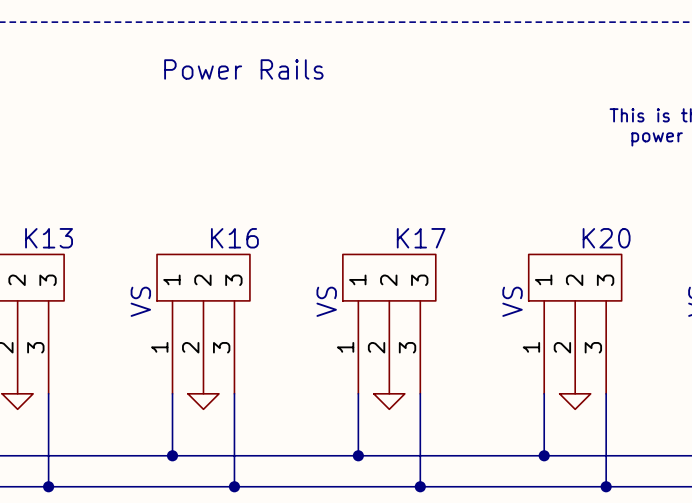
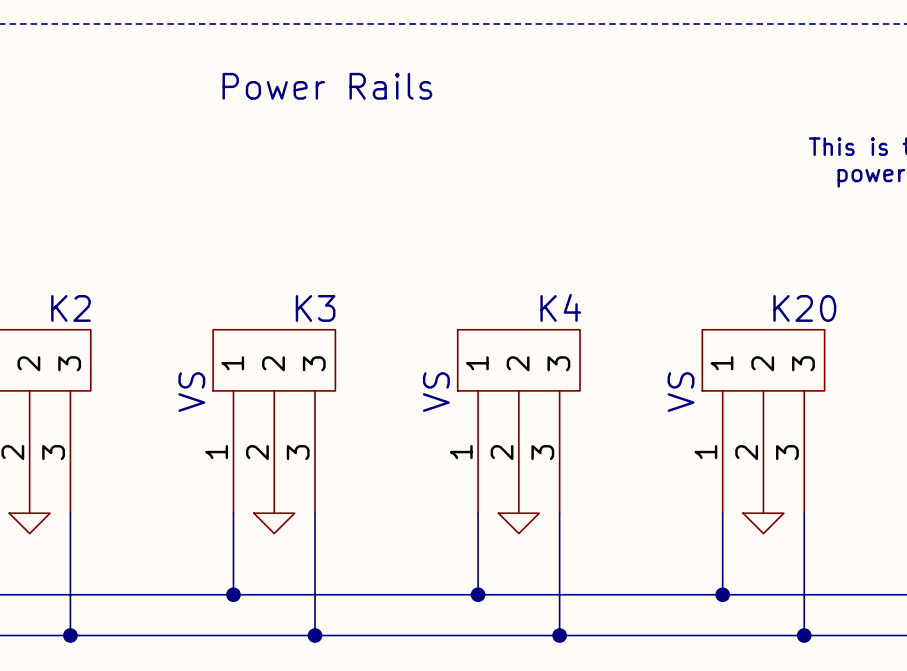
K13 name: K13 (49, 238) -> K2 (70, 308)
K16 name: K16 (234, 238) -> K3 (315, 308)
K17 name: K17 (421, 238) -> K4 (560, 307)

